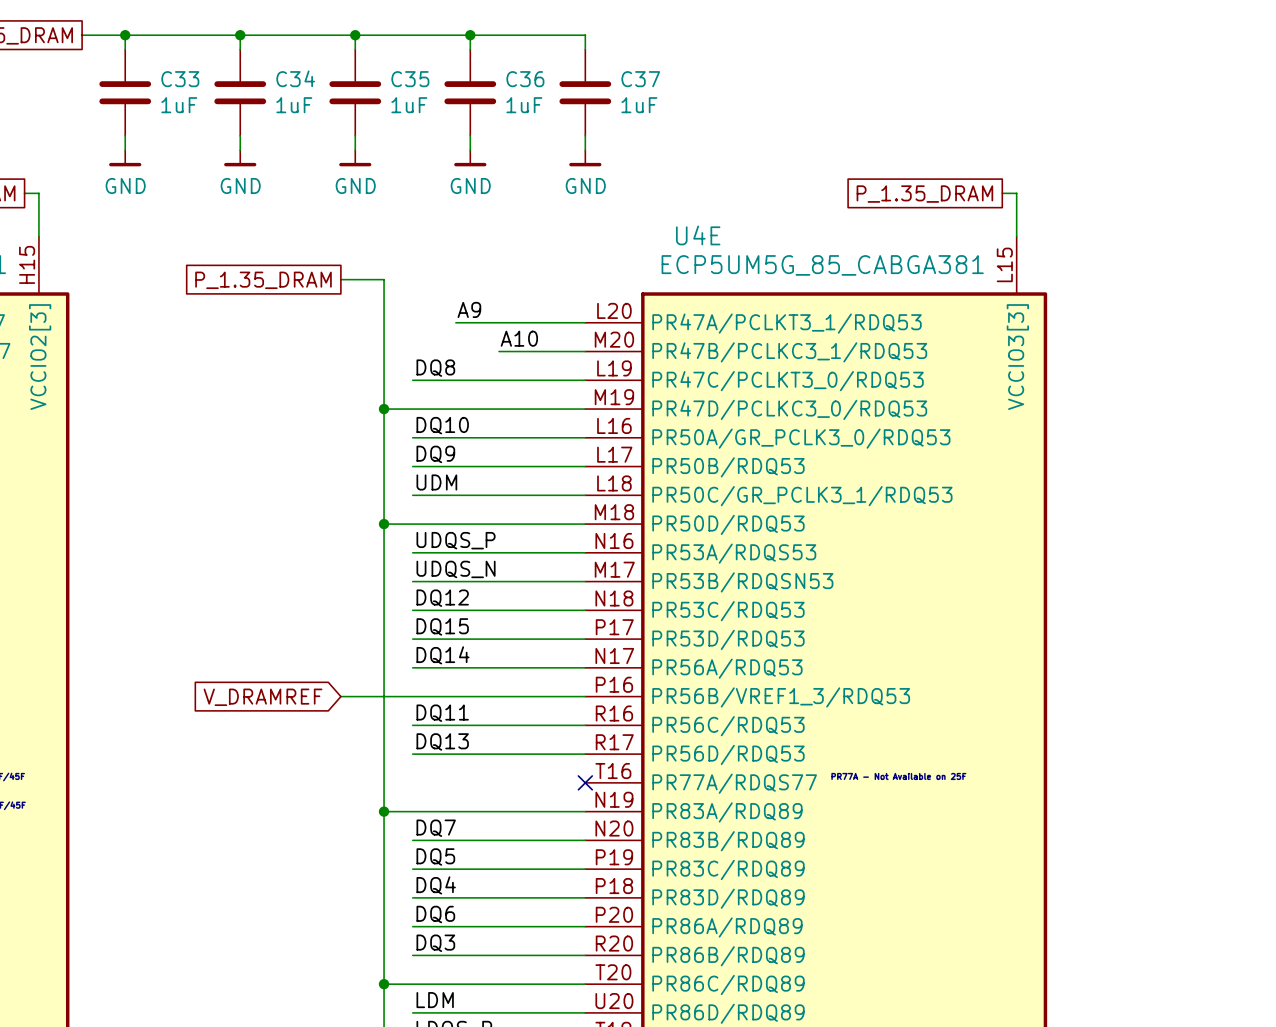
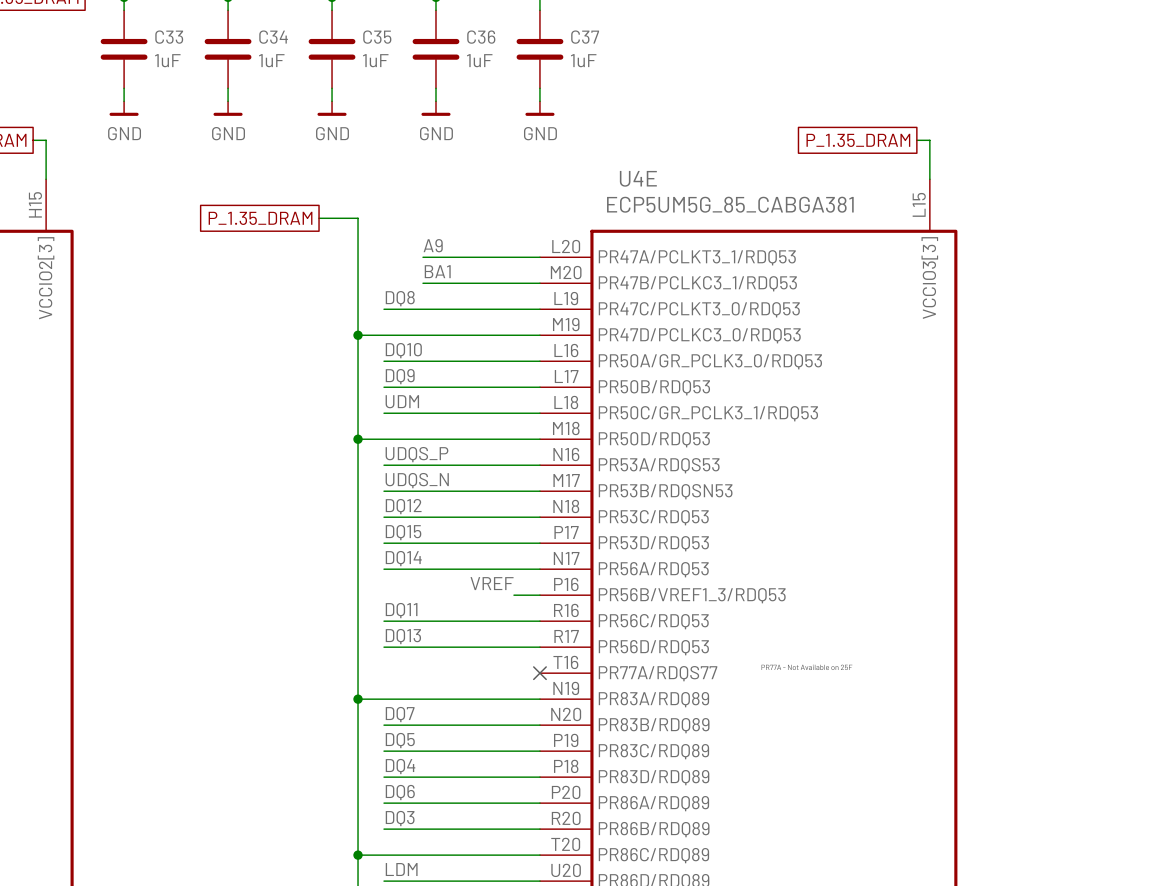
label: A10 (519, 338) -> BA1 (437, 271)
wire: none -> (422, 283) (461, 283)
label: none -> VREF (492, 583)
wire: (340, 696) (556, 696) -> none
global label: V_DRAMREF (262, 697) -> none

